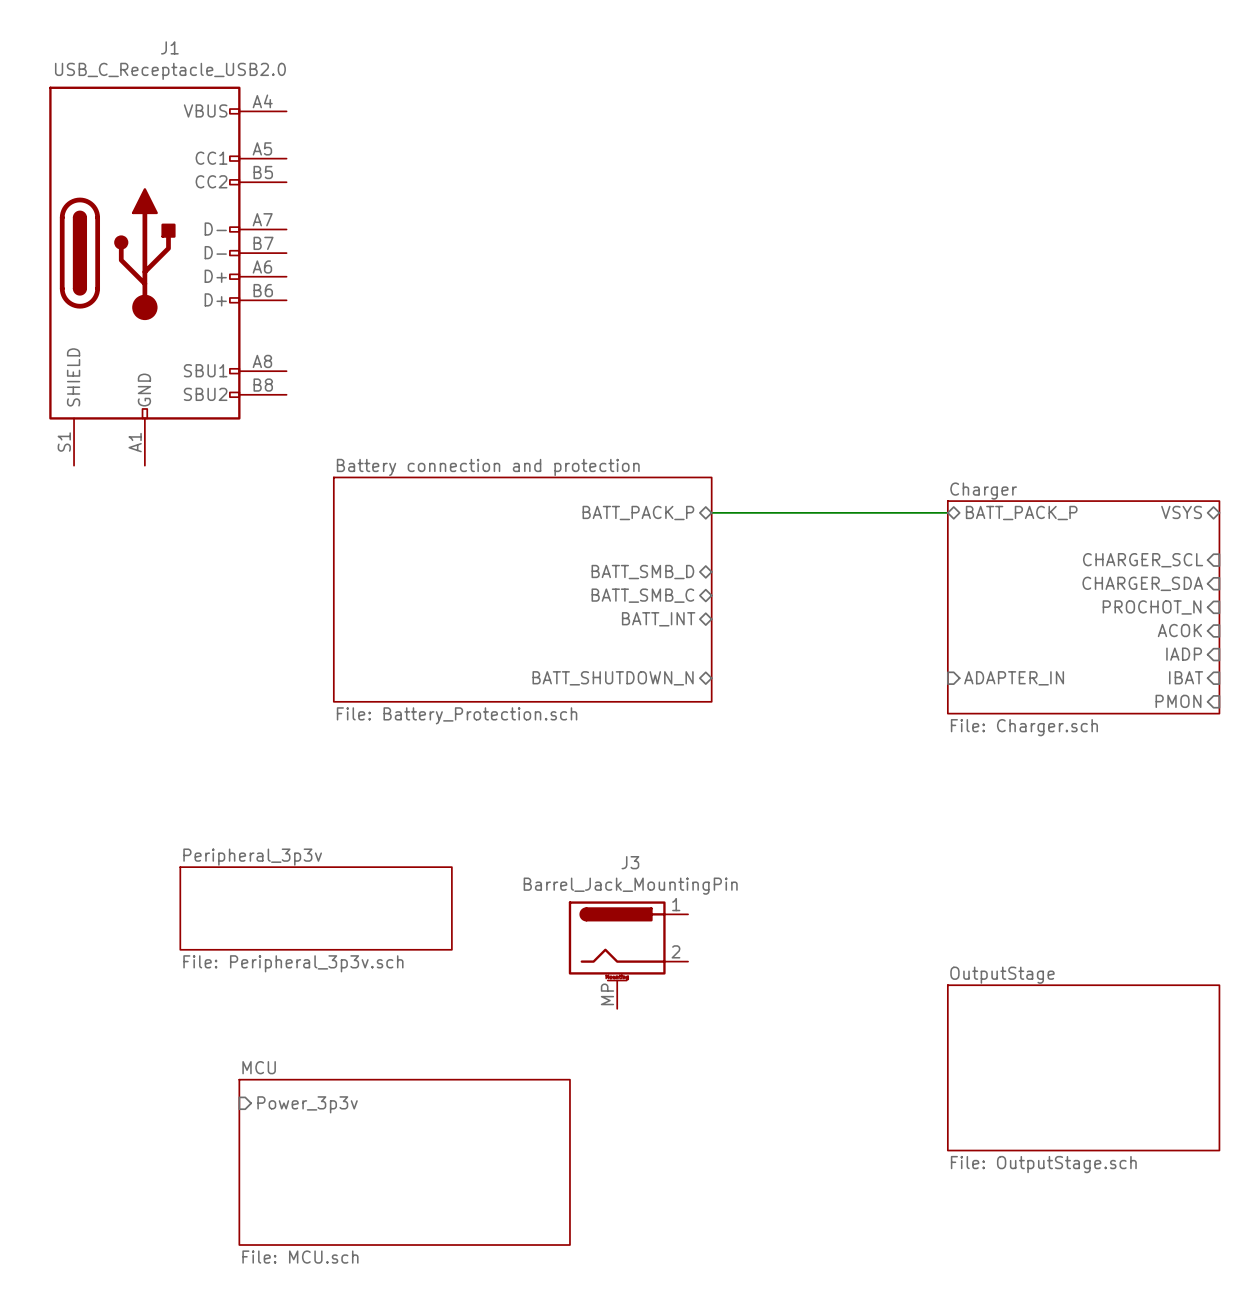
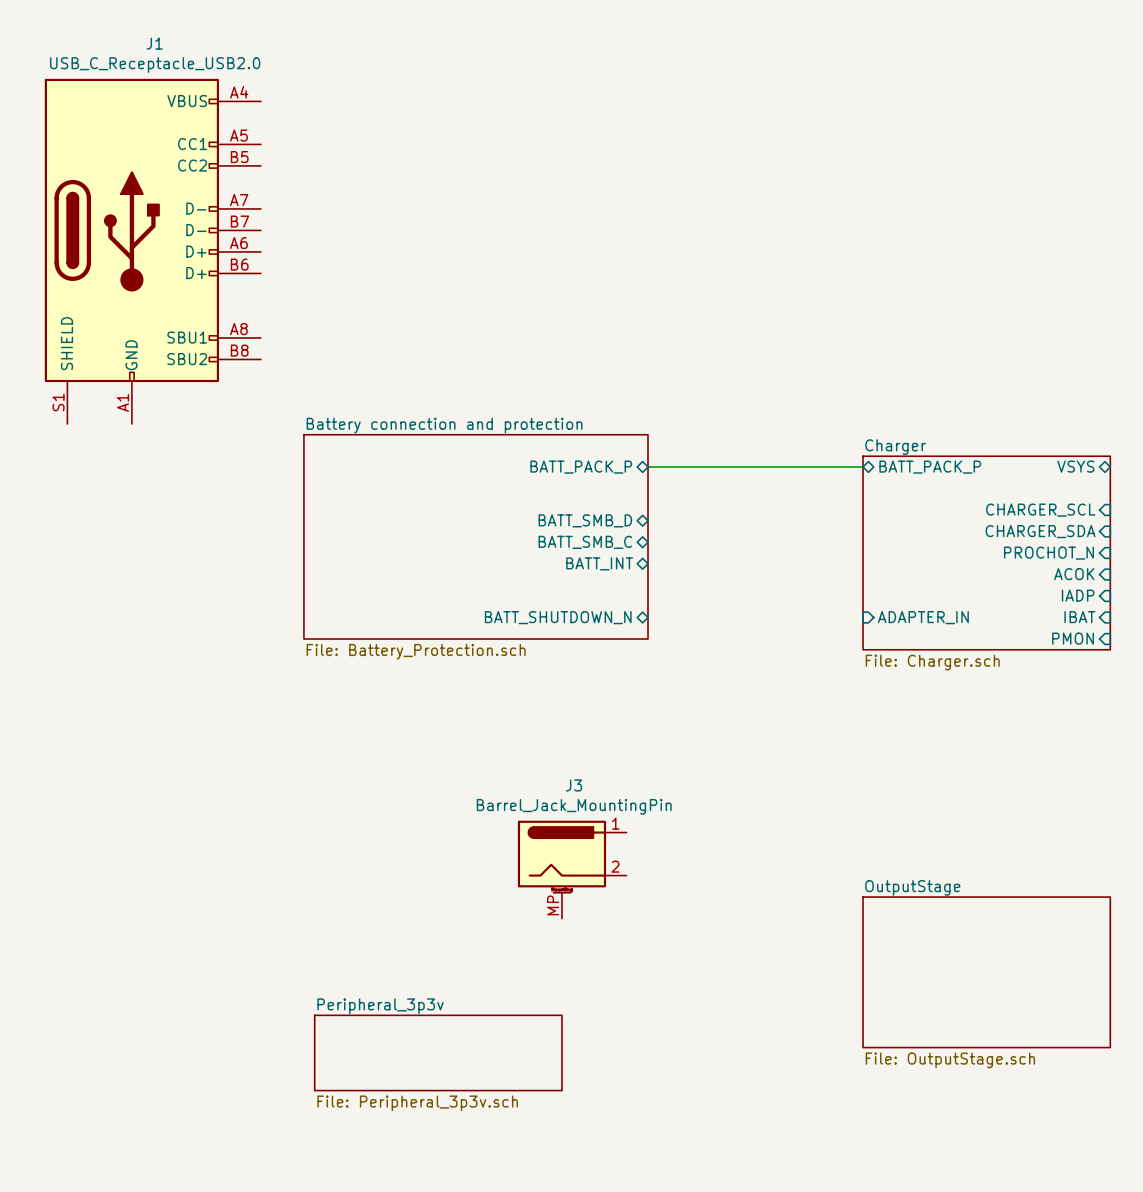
sheet Peripheral_3p3v position: (316, 908) -> (438, 1052)
sheet pin: Power_3p3v (307, 1104) -> none
sheet MCU: File: MCU.sch (404, 1162) -> none

